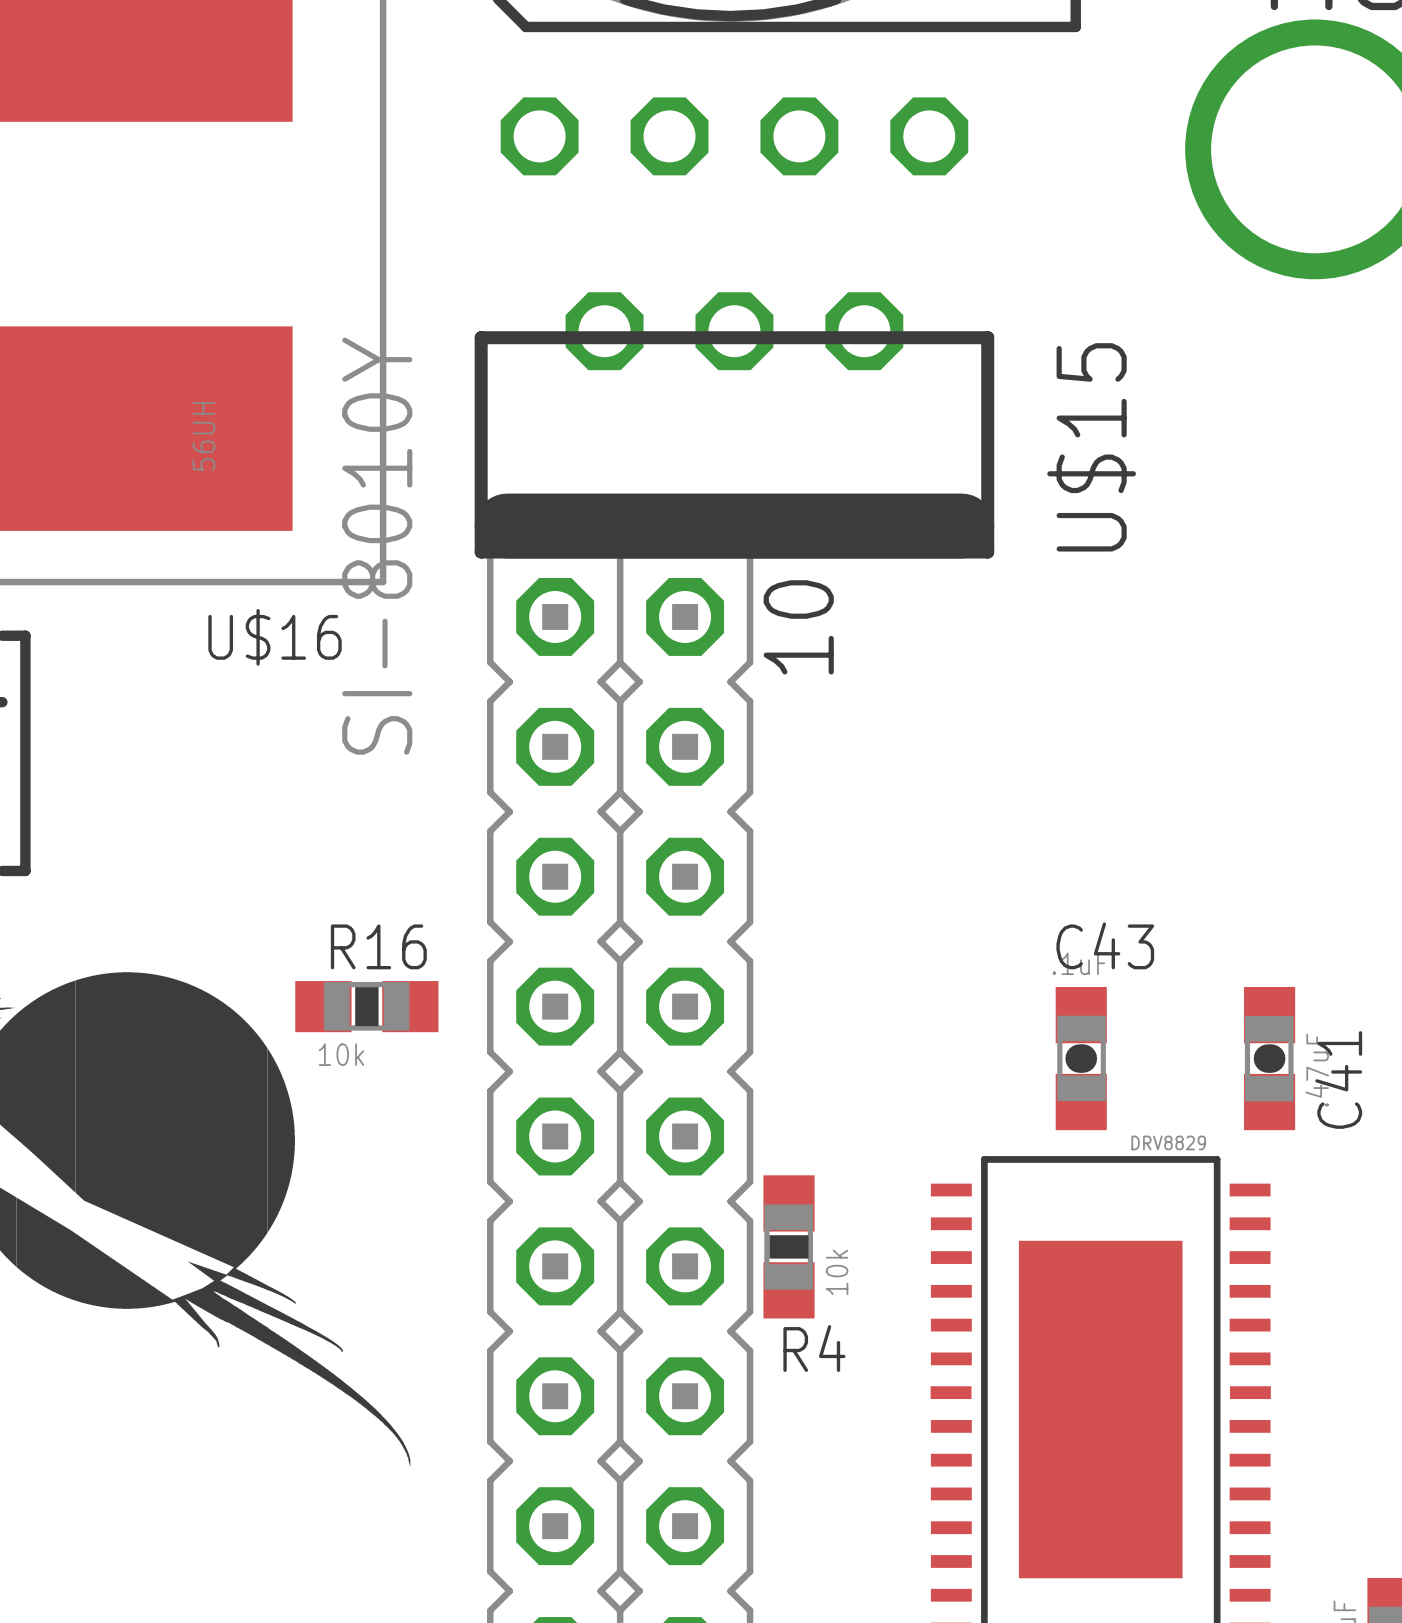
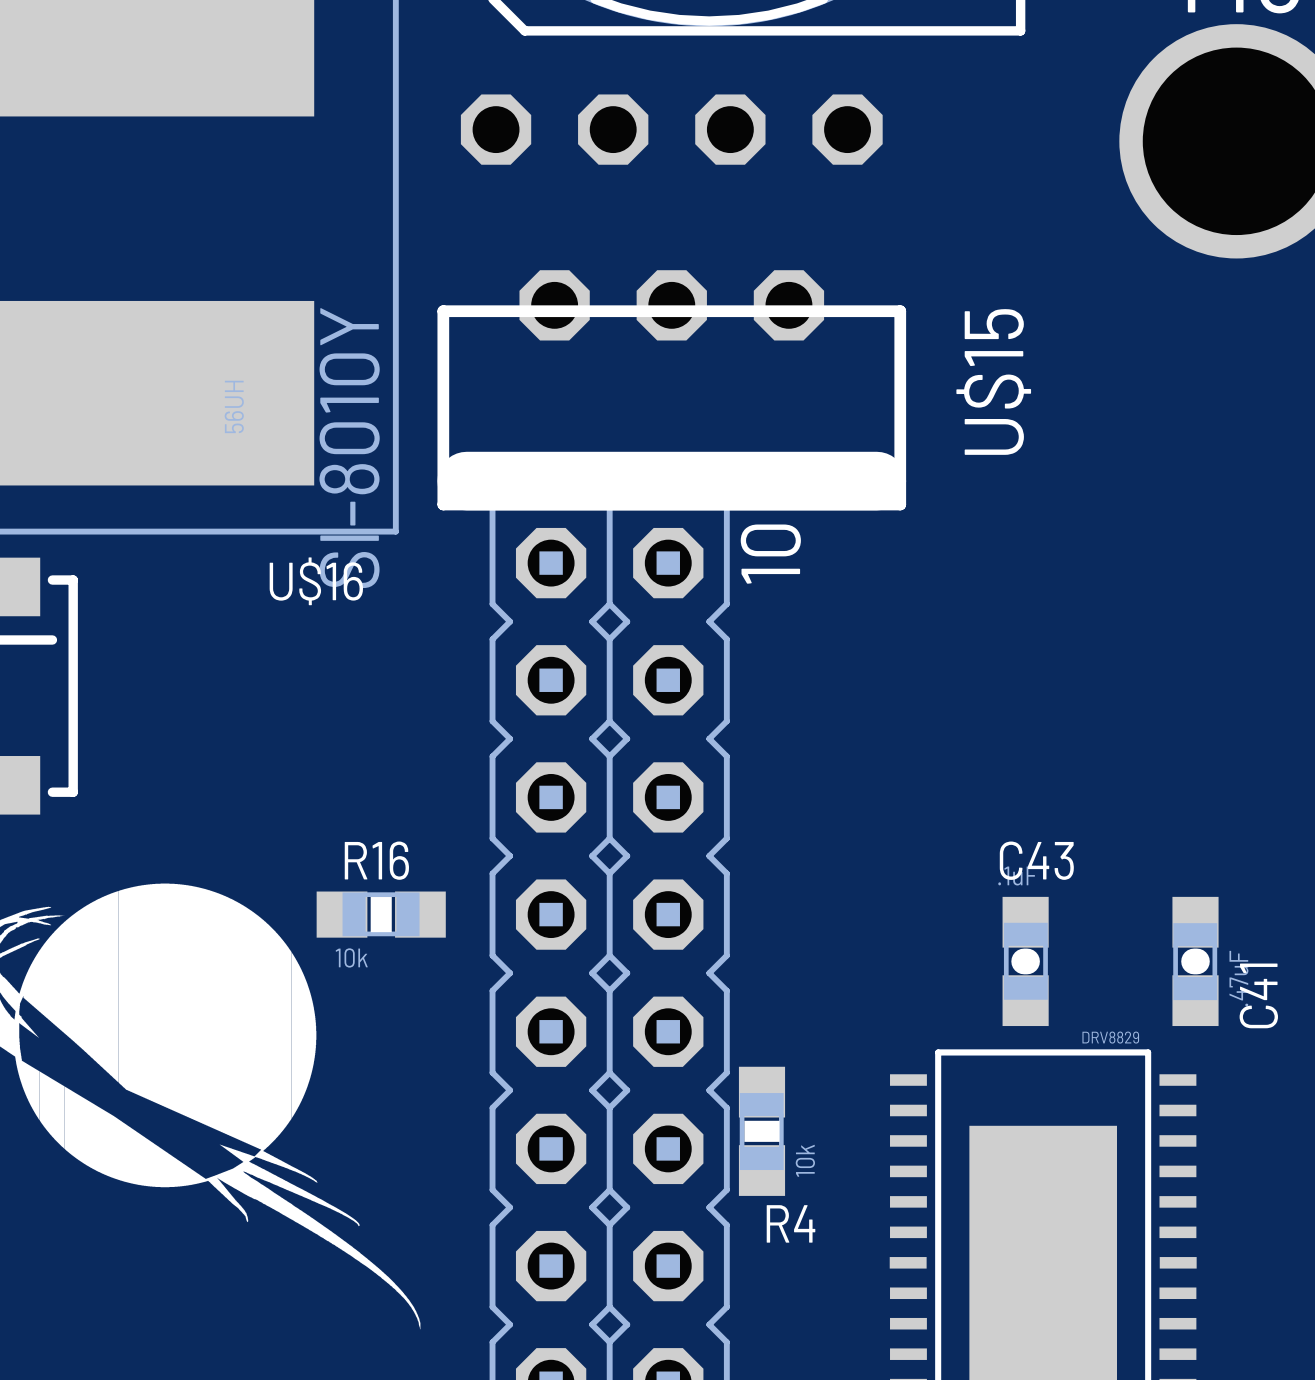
U$15 position: (734, 327) -> (671, 302)

